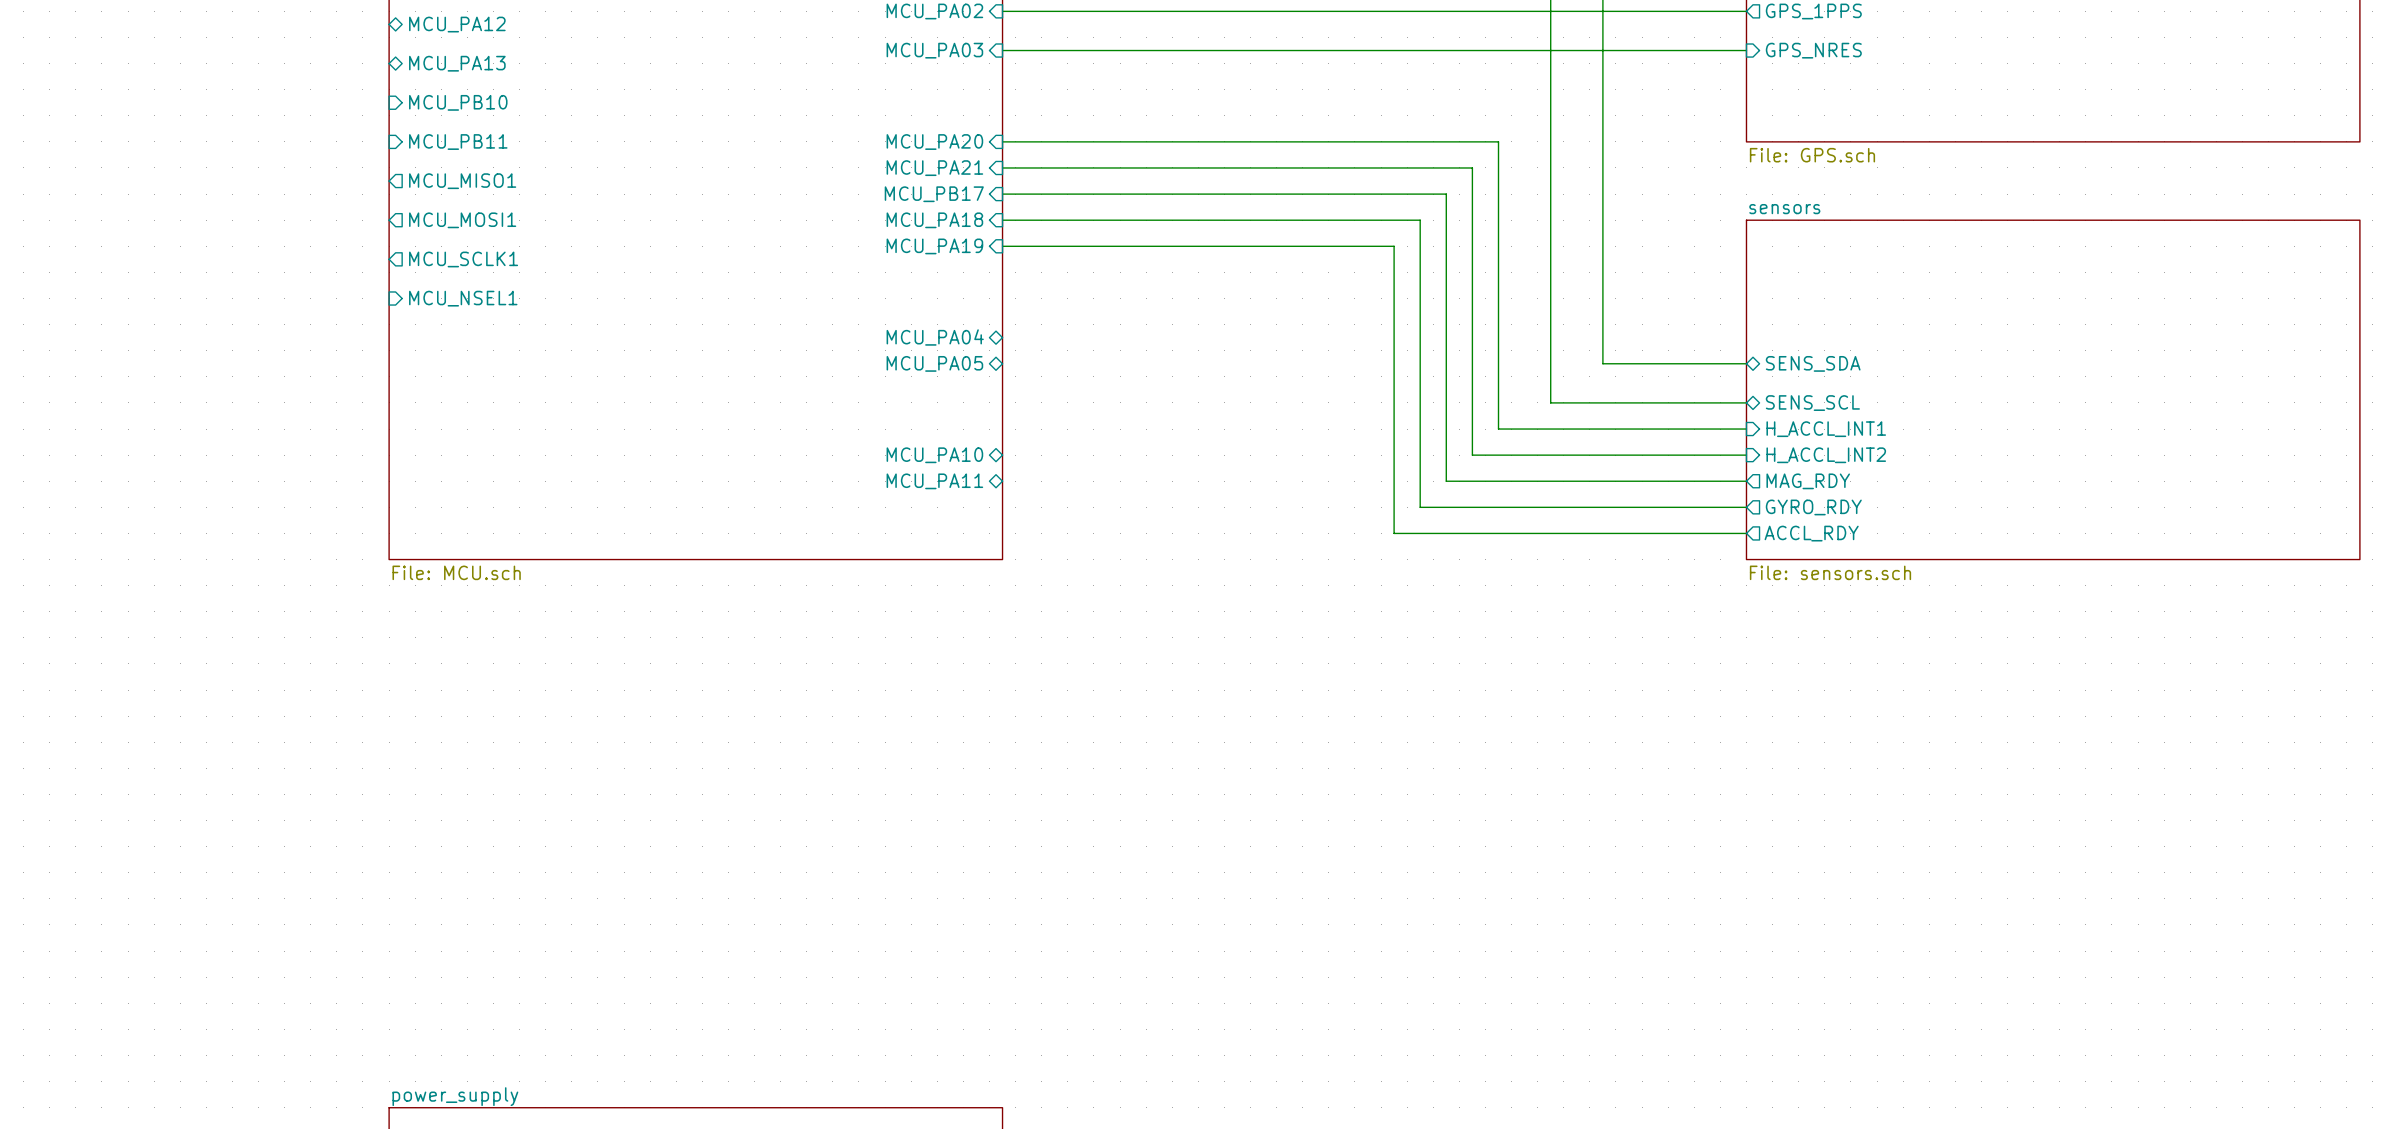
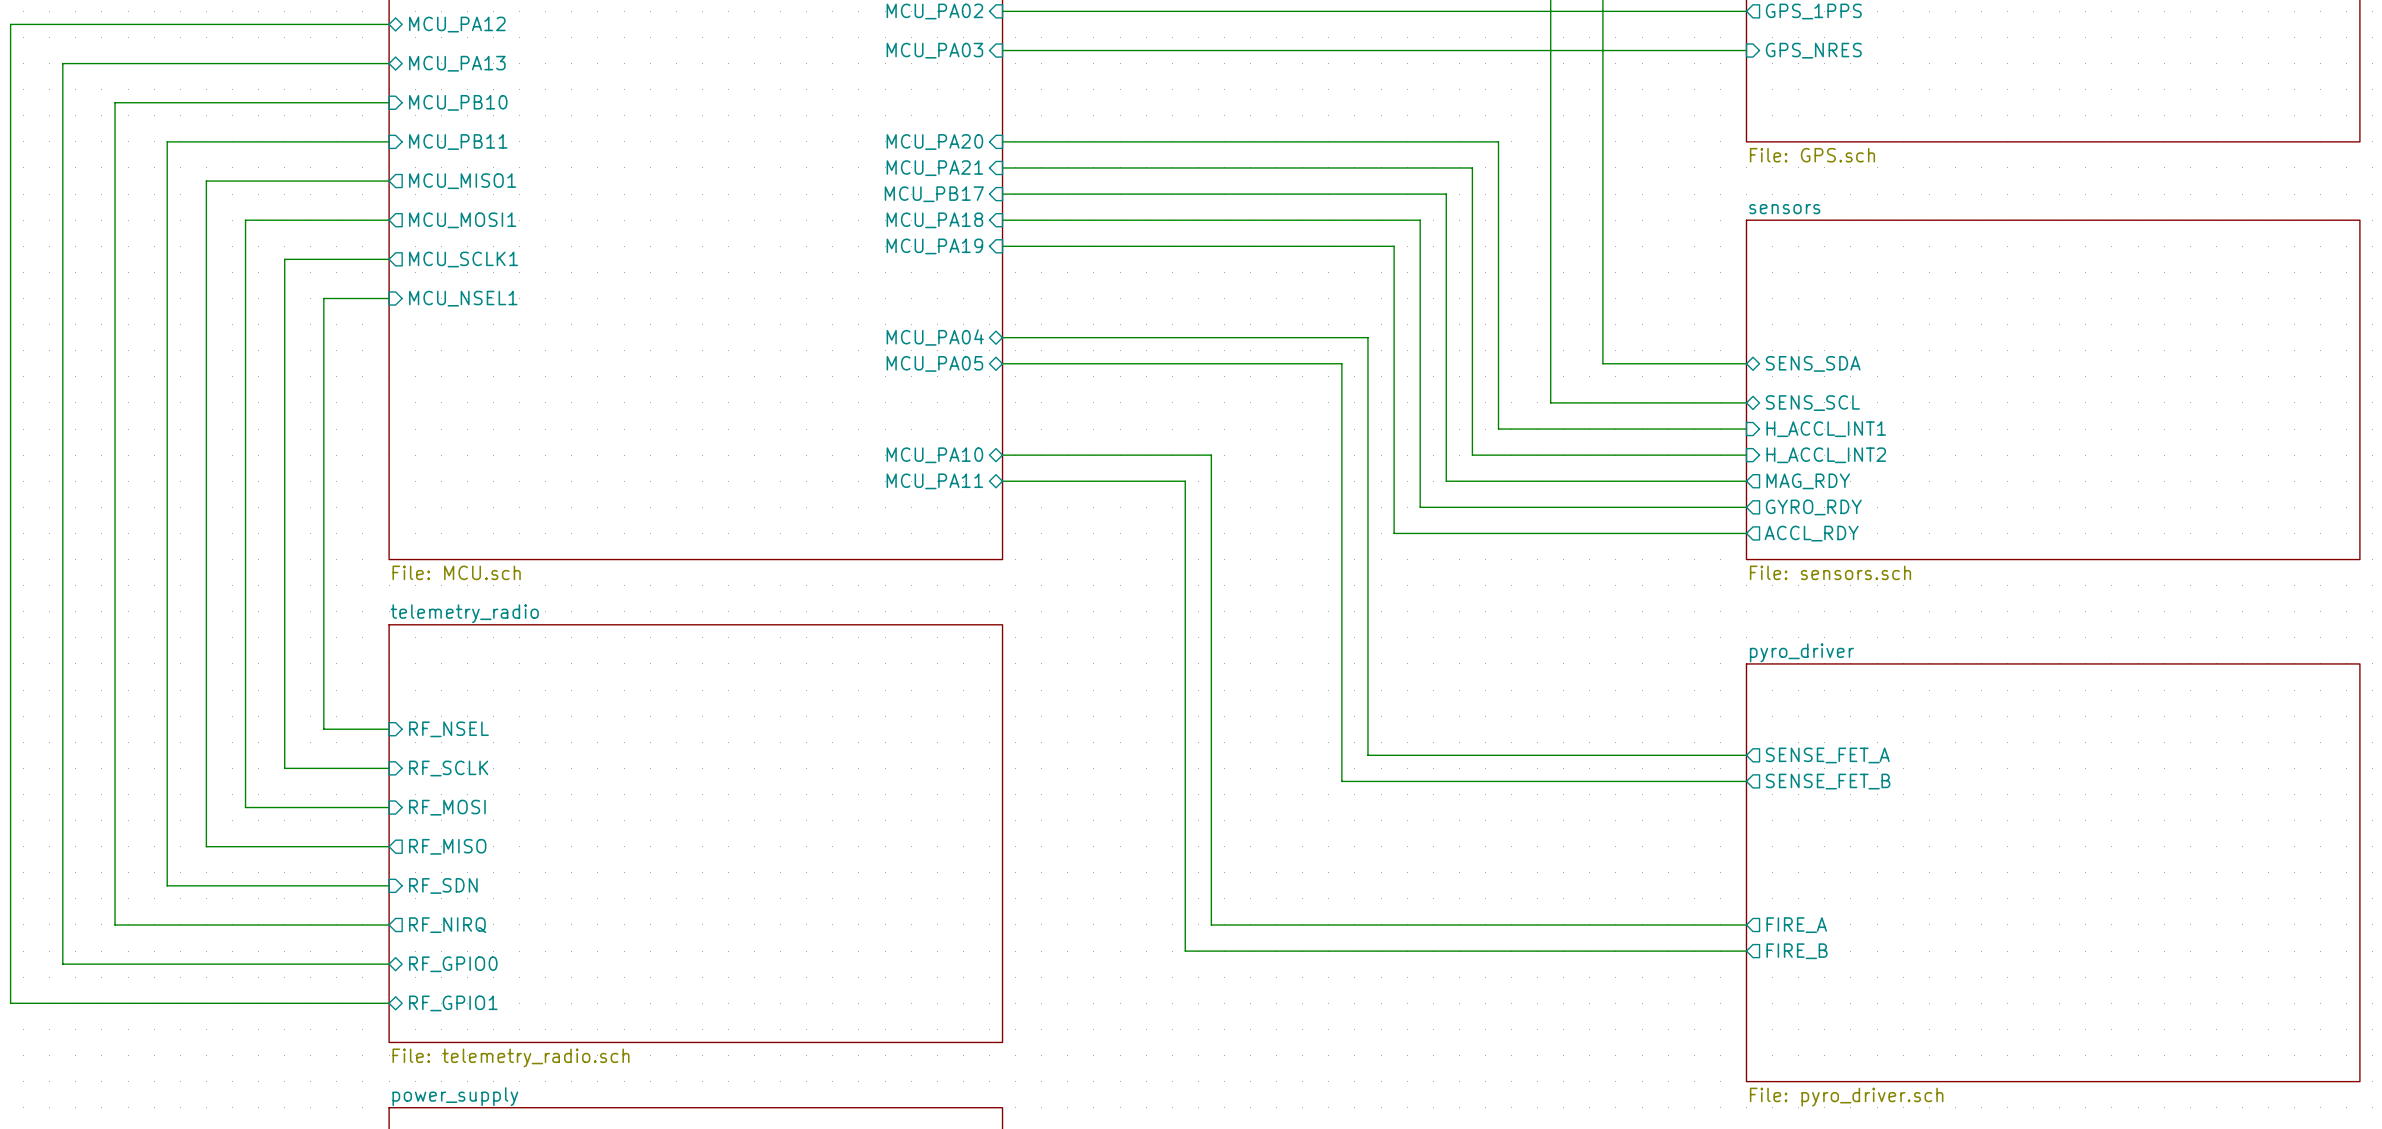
wire: none -> (389, 24) (10, 24) (10, 1003) (389, 1003)
wire: none -> (389, 63) (62, 63) (62, 964) (389, 964)
wire: none -> (389, 102) (115, 102) (115, 924) (389, 924)
wire: none -> (389, 141) (167, 141) (167, 885) (389, 885)
wire: none -> (389, 181) (206, 181) (206, 846) (389, 846)
wire: none -> (389, 220) (245, 220) (245, 807) (389, 807)
wire: none -> (389, 259) (284, 259) (284, 768) (389, 768)
wire: none -> (389, 298) (323, 298) (323, 729) (389, 729)
wire: none -> (1002, 337) (1367, 337) (1367, 755) (1746, 755)
wire: none -> (1002, 363) (1341, 363) (1341, 781) (1746, 781)
wire: none -> (1002, 455) (1211, 455) (1211, 924) (1746, 924)
wire: none -> (1002, 481) (1185, 481) (1185, 951) (1746, 951)
sheet pin: none -> RF_NSEL (448, 729)
sheet pin: none -> SENSE_FET_A (1827, 755)
sheet pin: none -> RF_SCLK (448, 768)
sheet pin: none -> SENSE_FET_B (1828, 781)
sheet pin: none -> RF_MOSI (447, 807)
sheet telemetry_radio: none -> File: telemetry_radio.sch (695, 833)
sheet pin: none -> RF_MISO (447, 846)
sheet pyro_driver: none -> File: pyro_driver.sch (2053, 872)
sheet pin: none -> RF_SDN (443, 885)
sheet pin: none -> RF_NIRQ (447, 925)
sheet pin: none -> FIRE_A (1796, 925)
sheet pin: none -> FIRE_B (1797, 951)
sheet pin: none -> RF_GPIO0 (453, 964)
sheet pin: none -> RF_GPIO1 (453, 1003)

